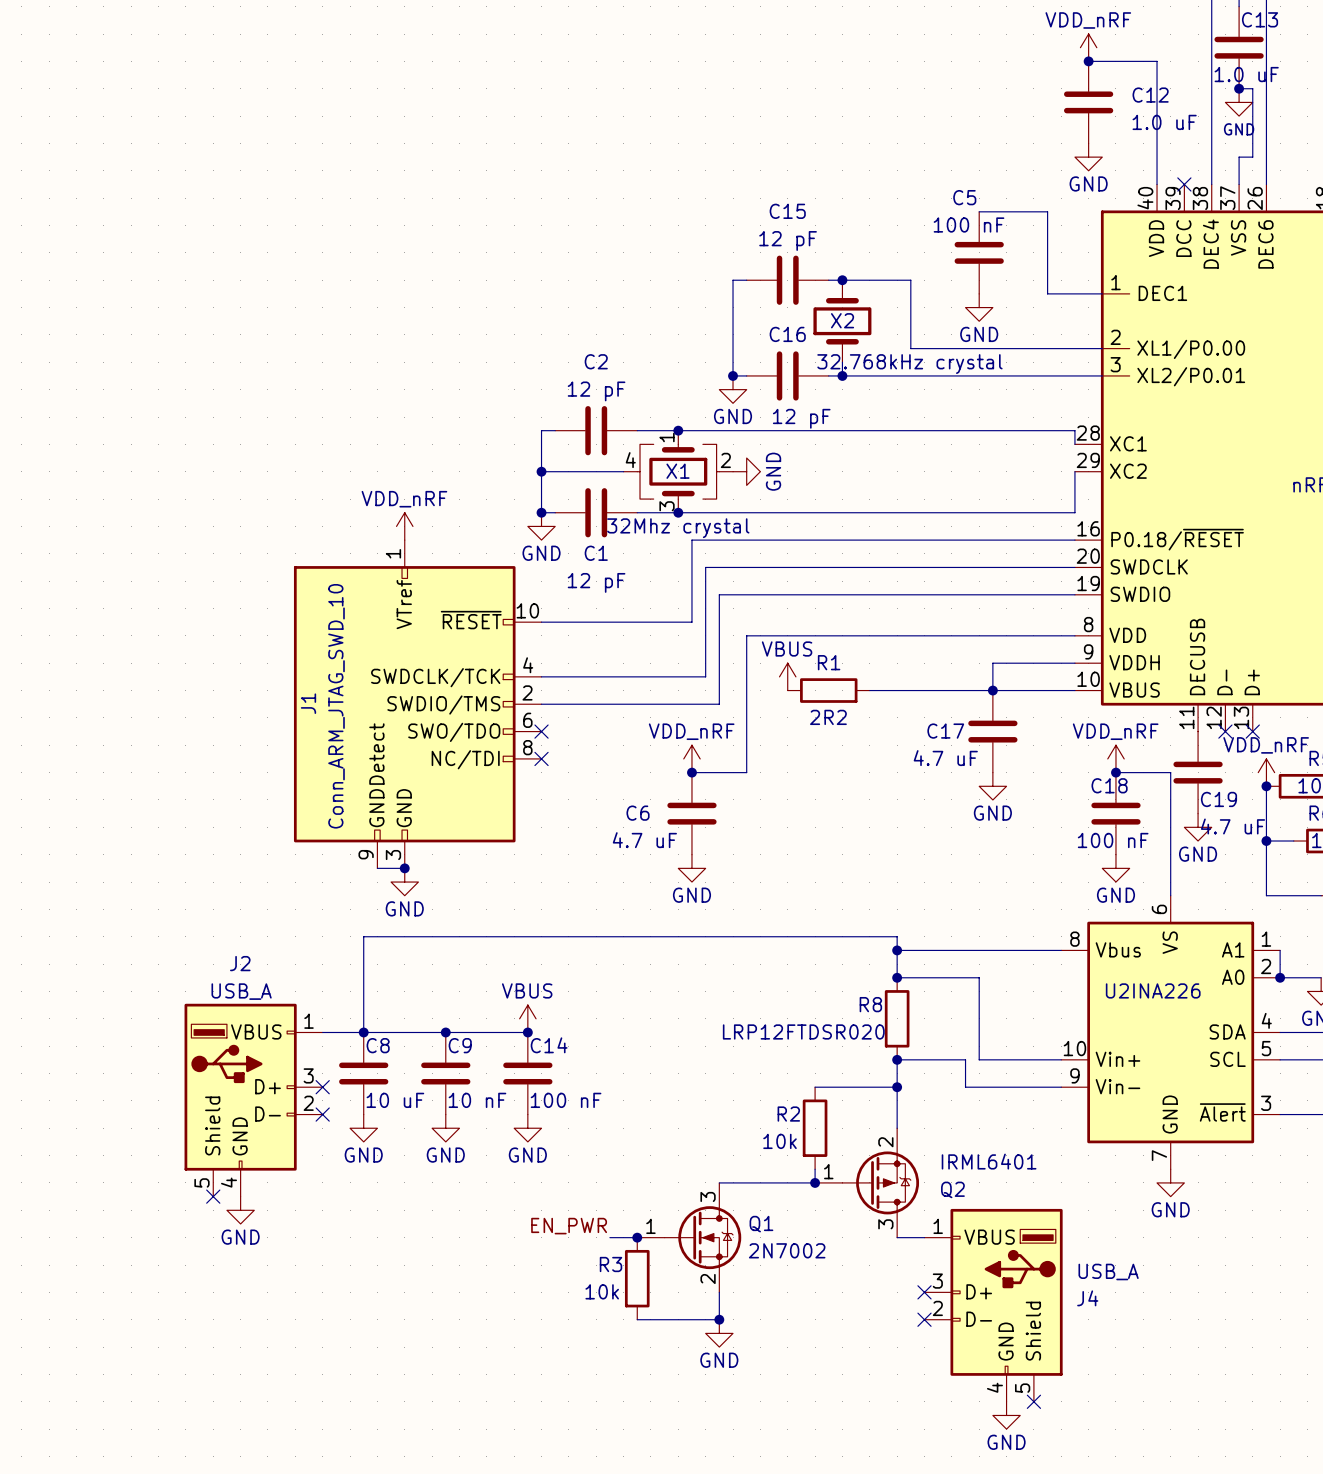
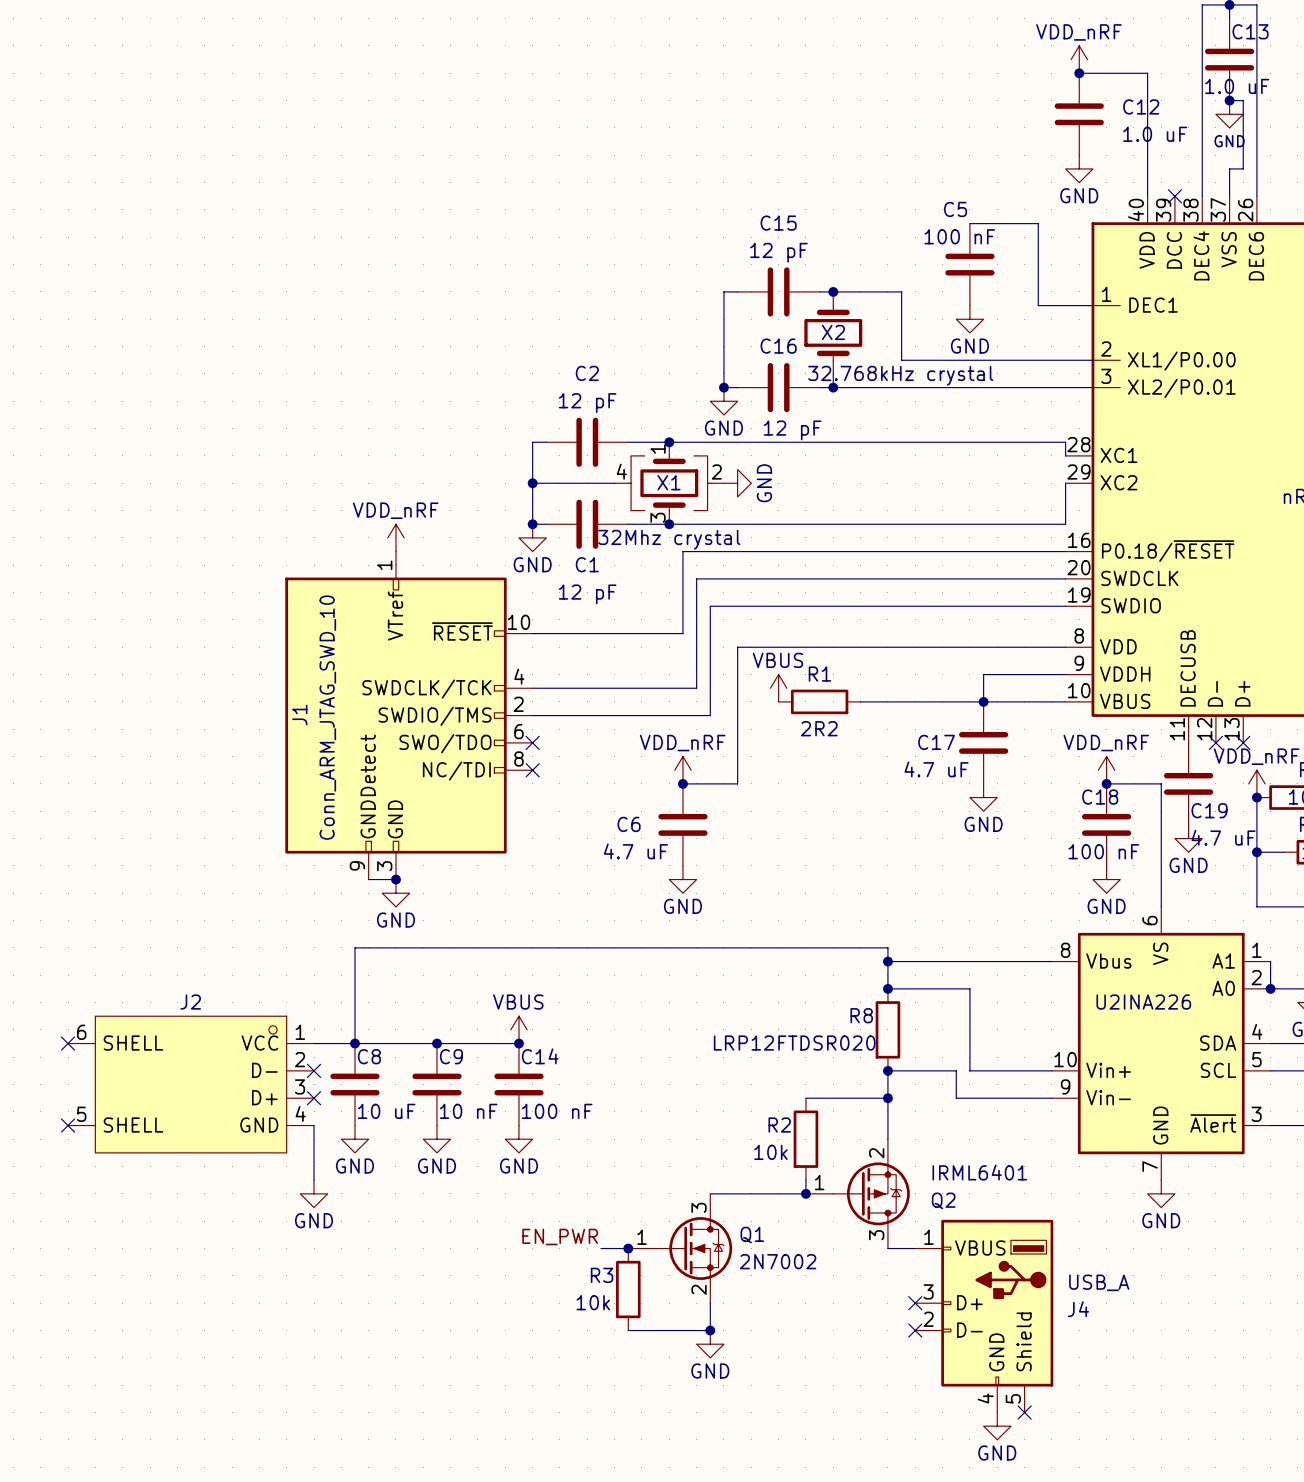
J2 name position: J2 (240, 963) -> J2 (190, 1002)
J2 value: USB_A (241, 991) -> none
J2 symbol: [184, 1003, 323, 1197] -> [68, 1016, 315, 1153]
no-connect mark: none -> (68, 1043)
no-connect mark: none -> (68, 1125)
wire: none -> (314, 1125) (314, 1180)
no-connect mark position: (322, 1114) -> (314, 1070)
no-connect mark: (213, 1196) -> none
power symbol position: GND (240, 1210) -> GND (314, 1193)

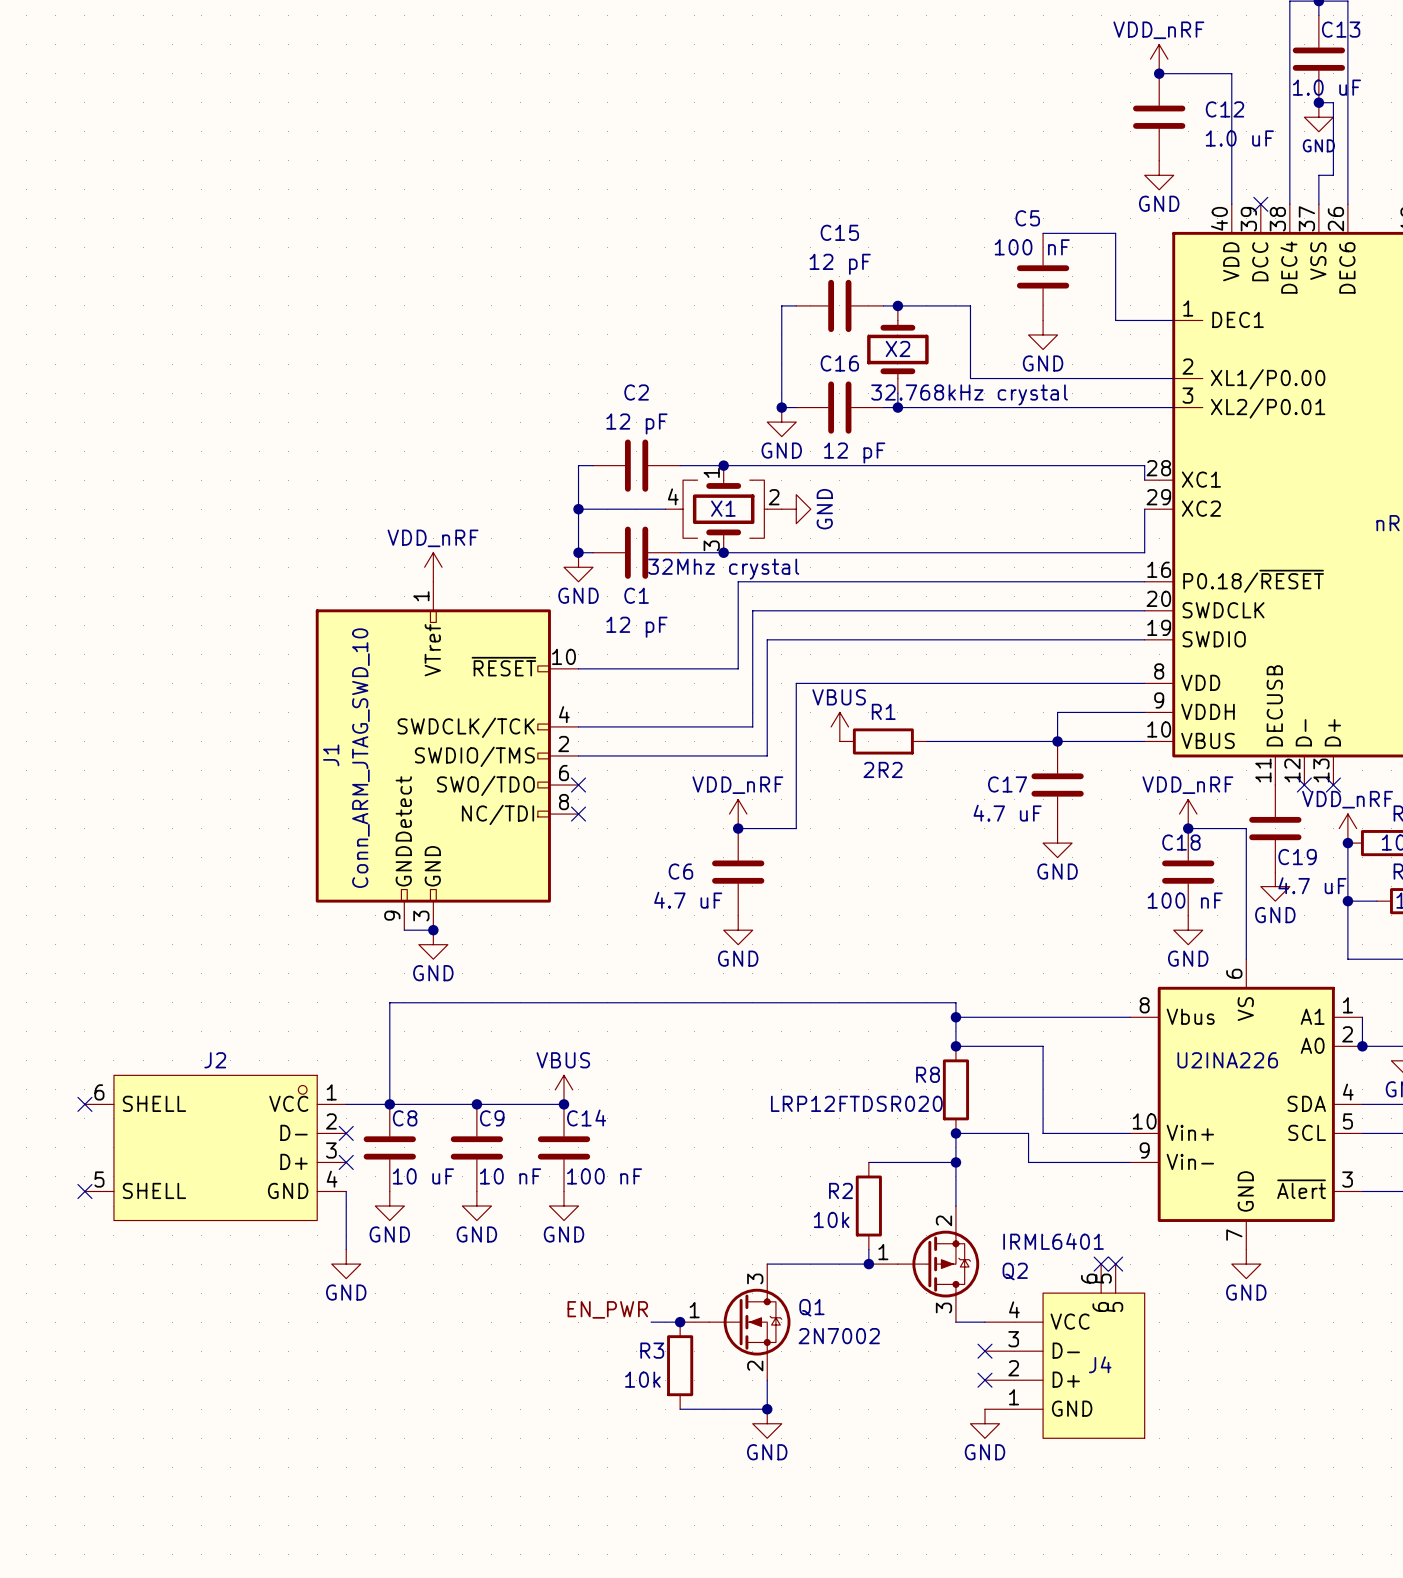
no-connect mark: none -> (1101, 1264)
no-connect mark: none -> (1115, 1264)
J4 symbol: [915, 1219, 1054, 1413] -> [984, 1264, 1145, 1439]
J4 value: USB_A (1099, 1282) -> none
J4 name position: J4 (1078, 1309) -> J4 (1100, 1364)
no-connect mark position: (915, 1330) -> (984, 1351)
no-connect mark: (1024, 1412) -> none
power symbol position: GND (997, 1426) -> GND (984, 1423)

